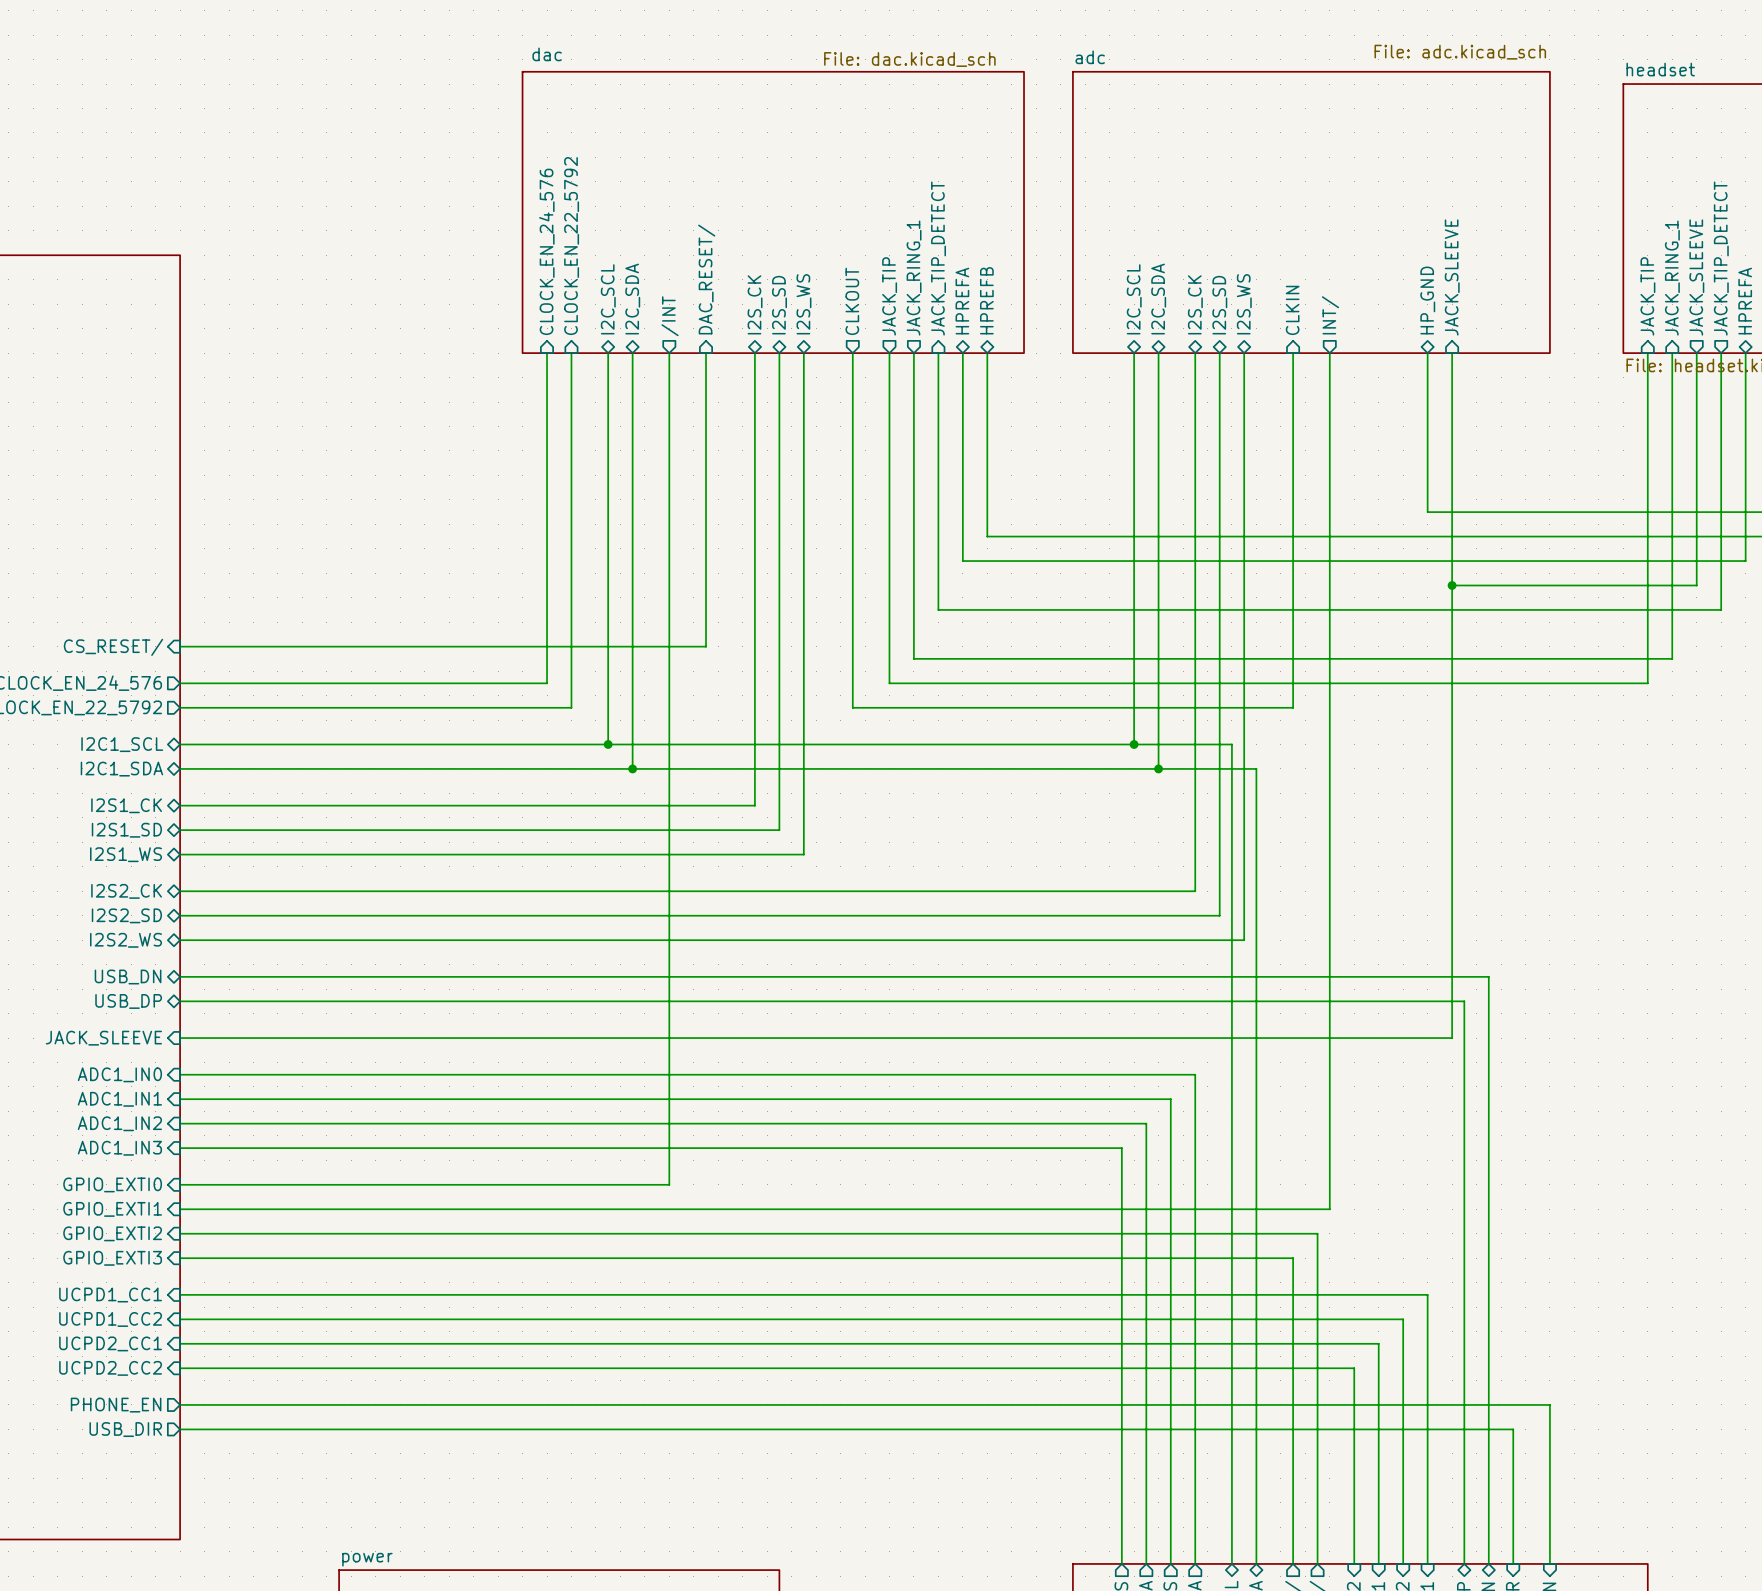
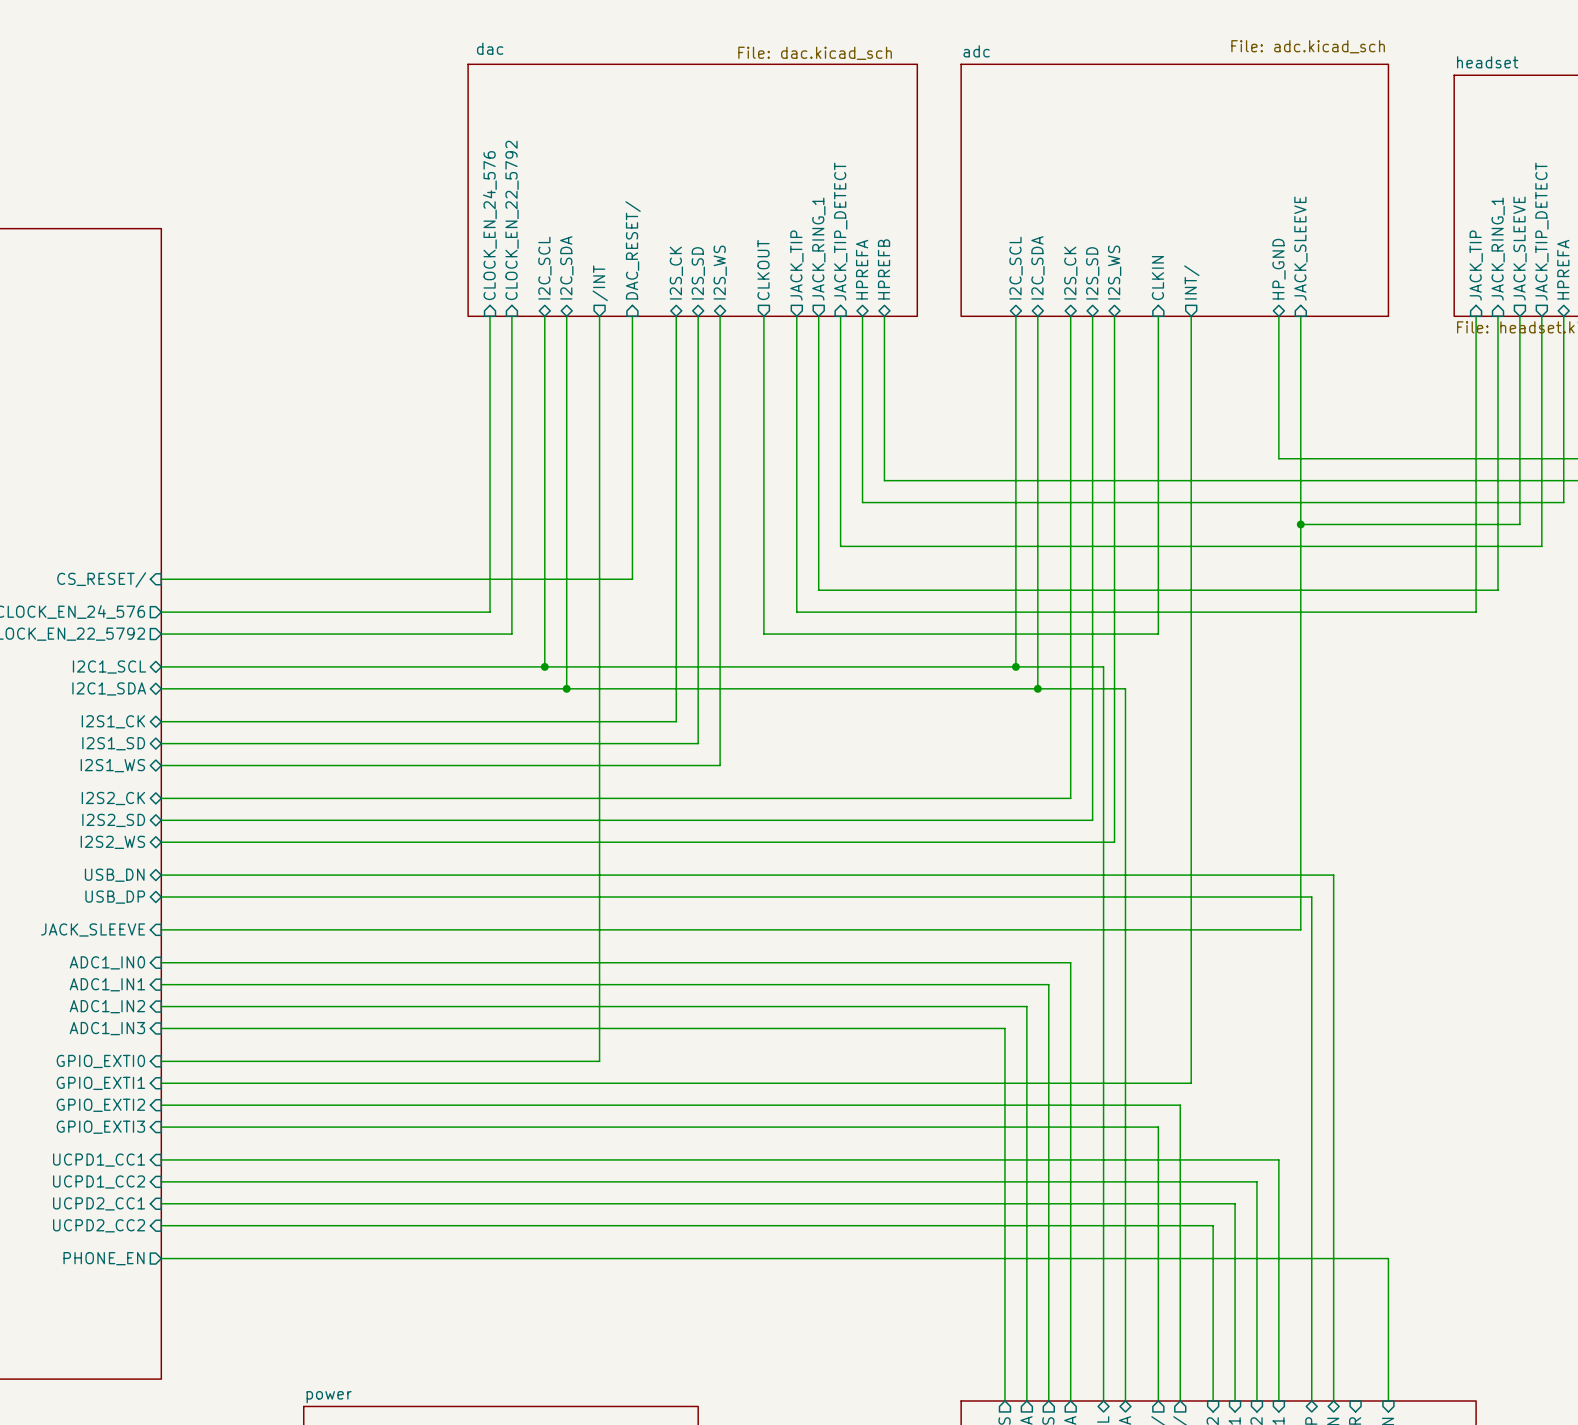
sheet pin: USB_DIR (125, 1429) -> none
wire: (180, 1429) (1513, 1429) (1513, 1563) -> none

